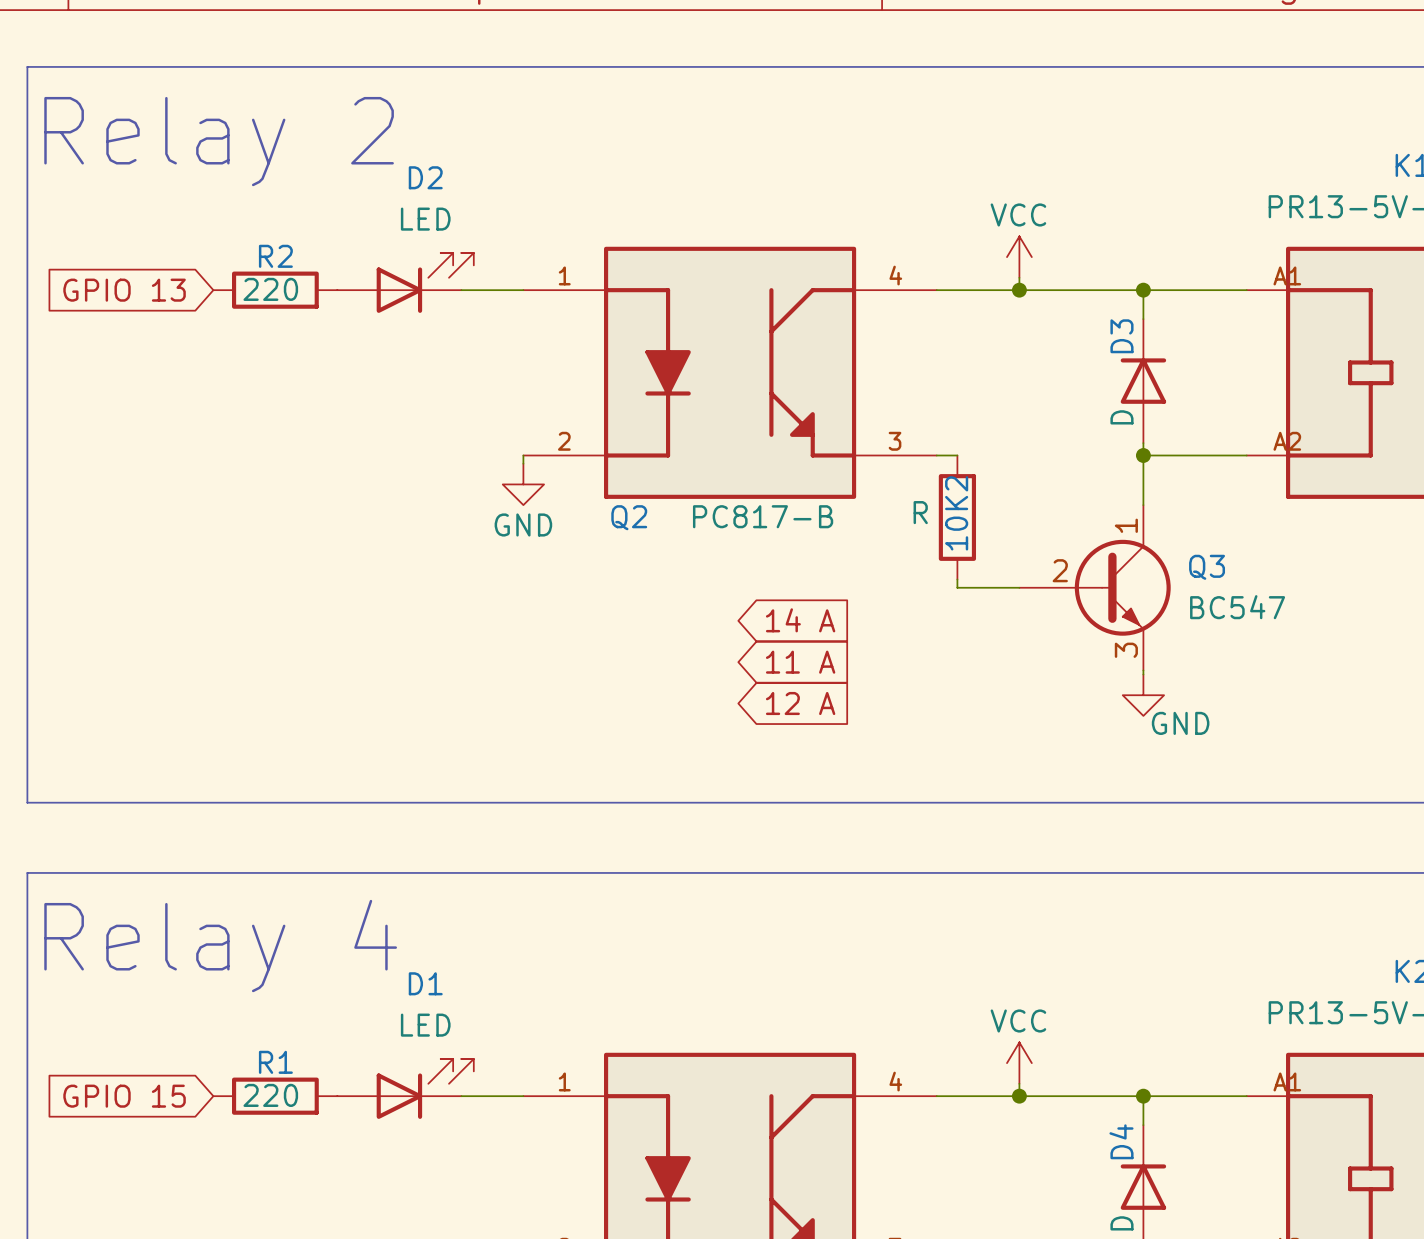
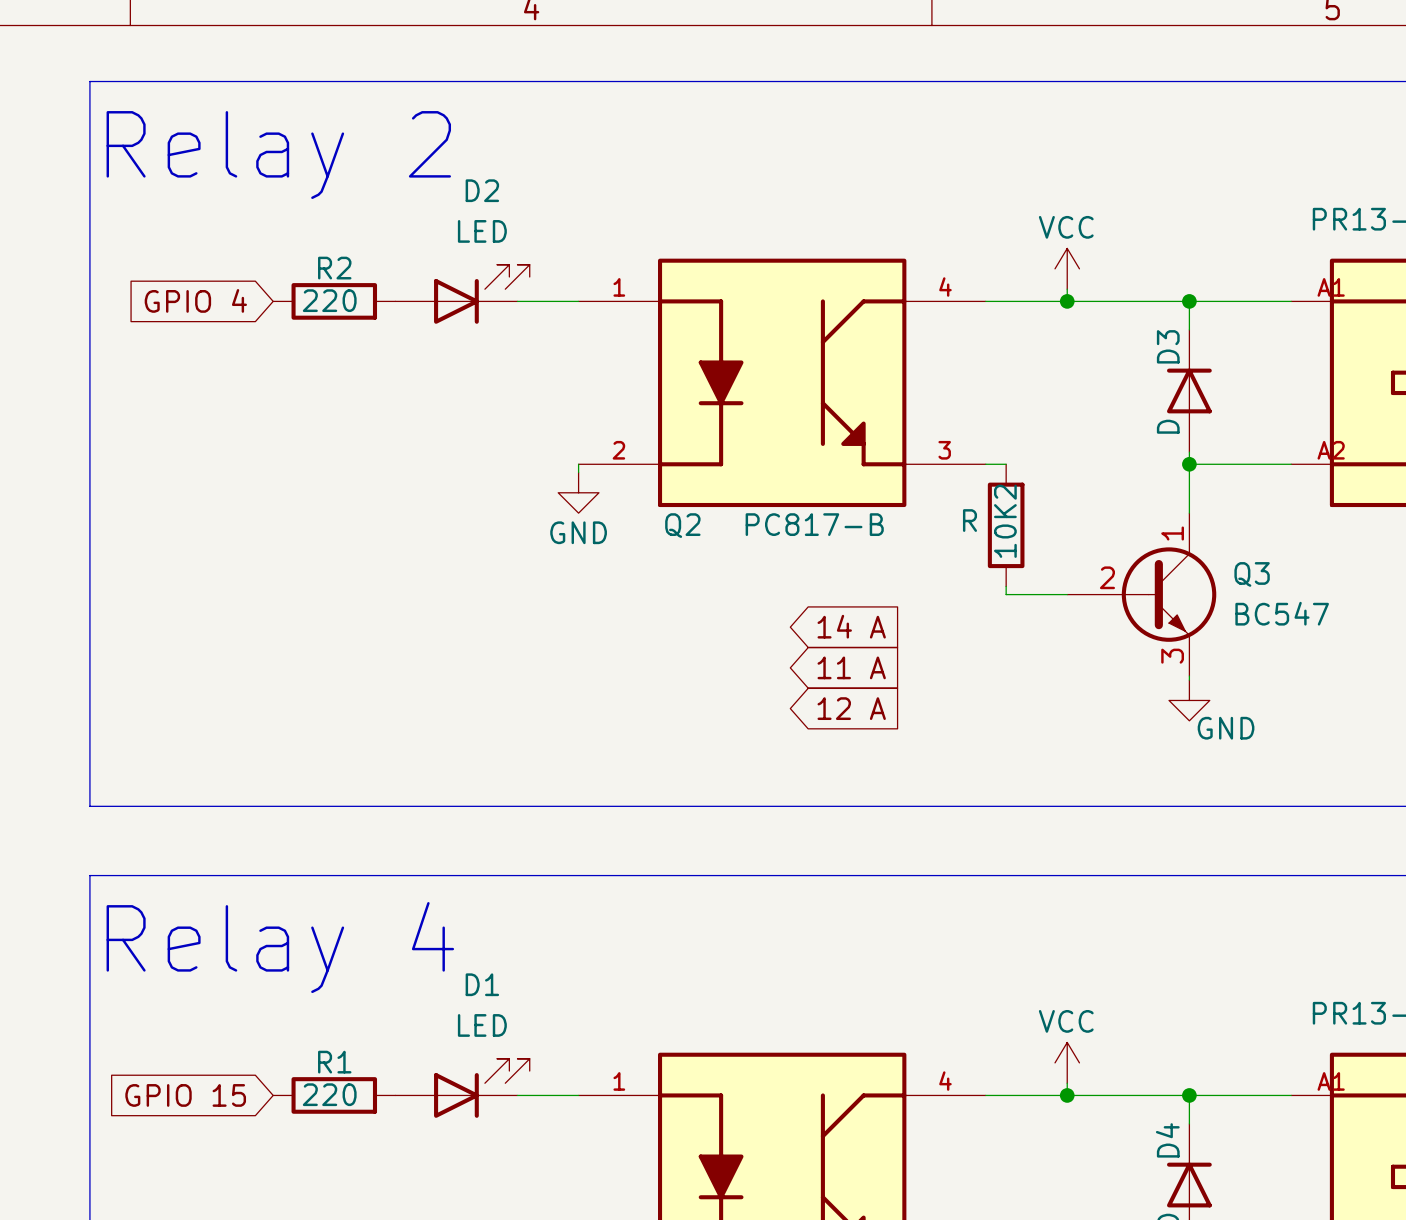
global label: GPIO 13 (124, 290) -> GPIO 4 (195, 300)

